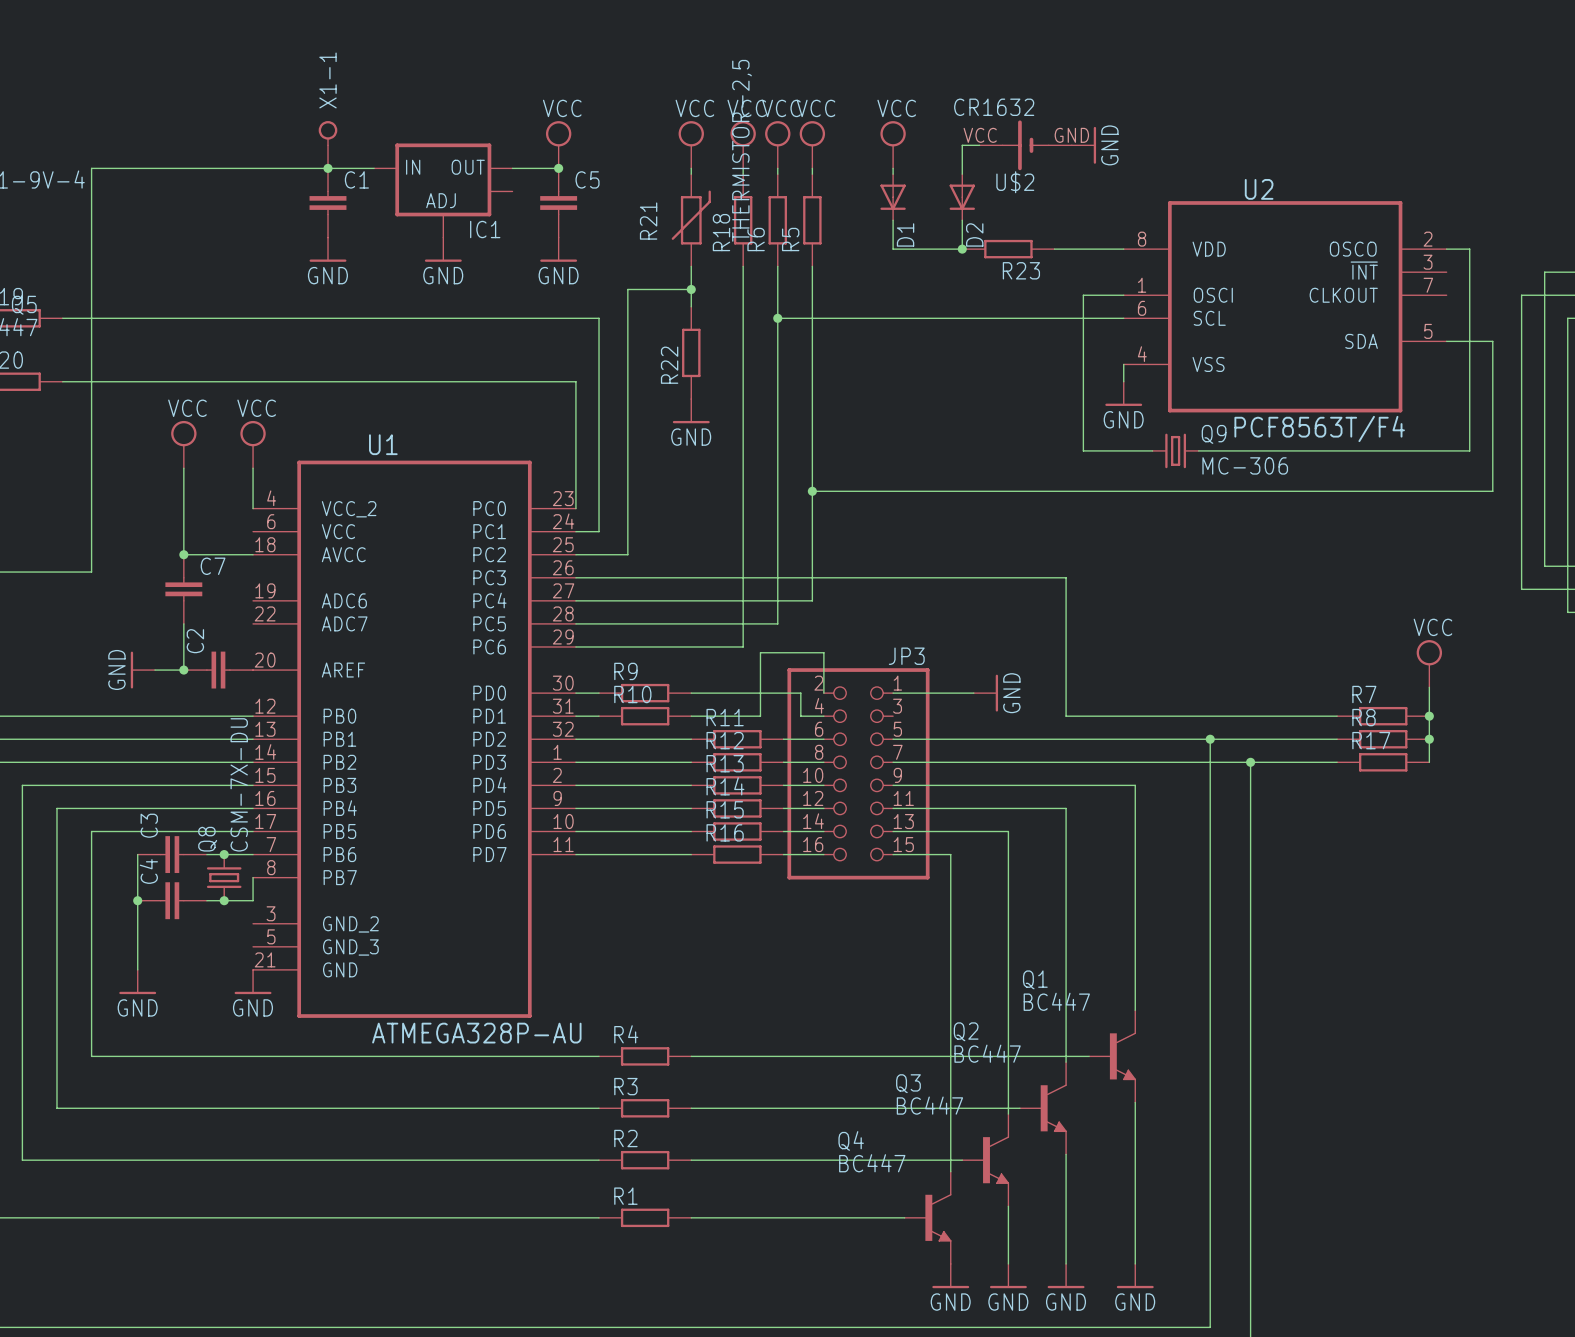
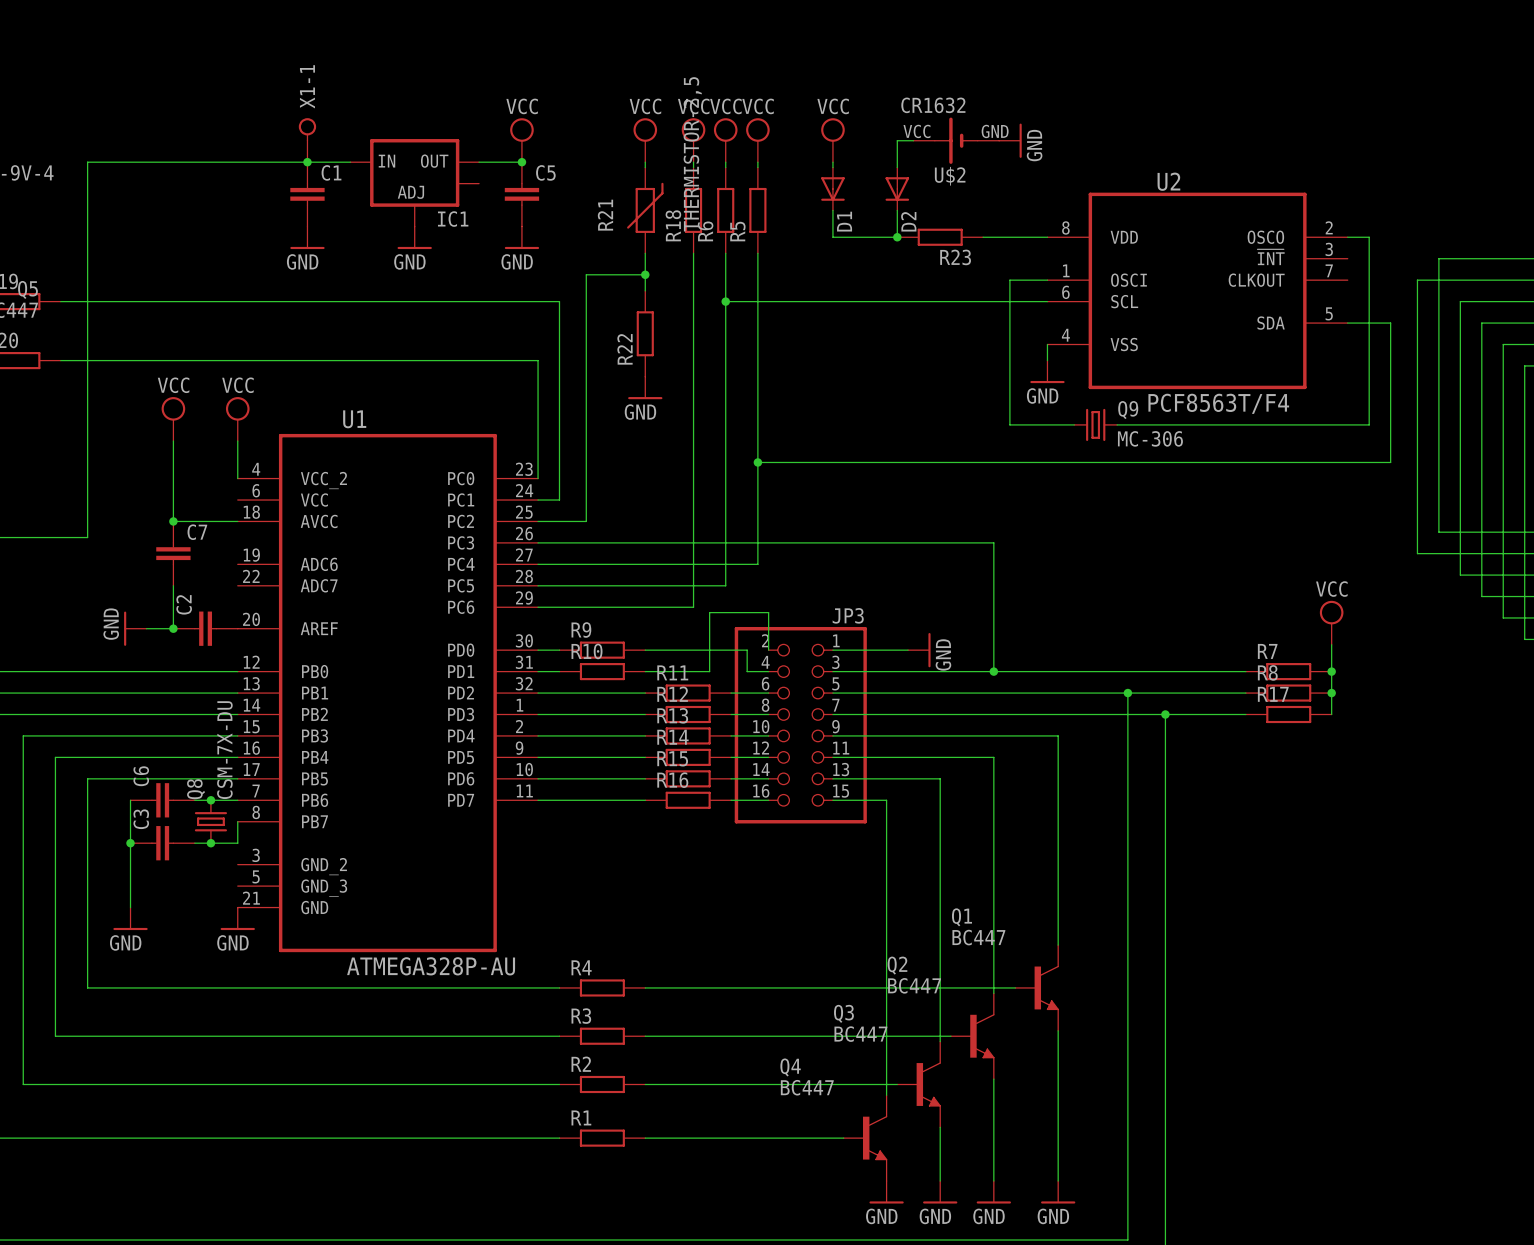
wire: none -> (832, 671) (993, 671)
junction: none -> (993, 671)
C3 name: C3 (149, 825) -> C6 (141, 776)
C4 name: C4 (148, 871) -> C3 (141, 819)

